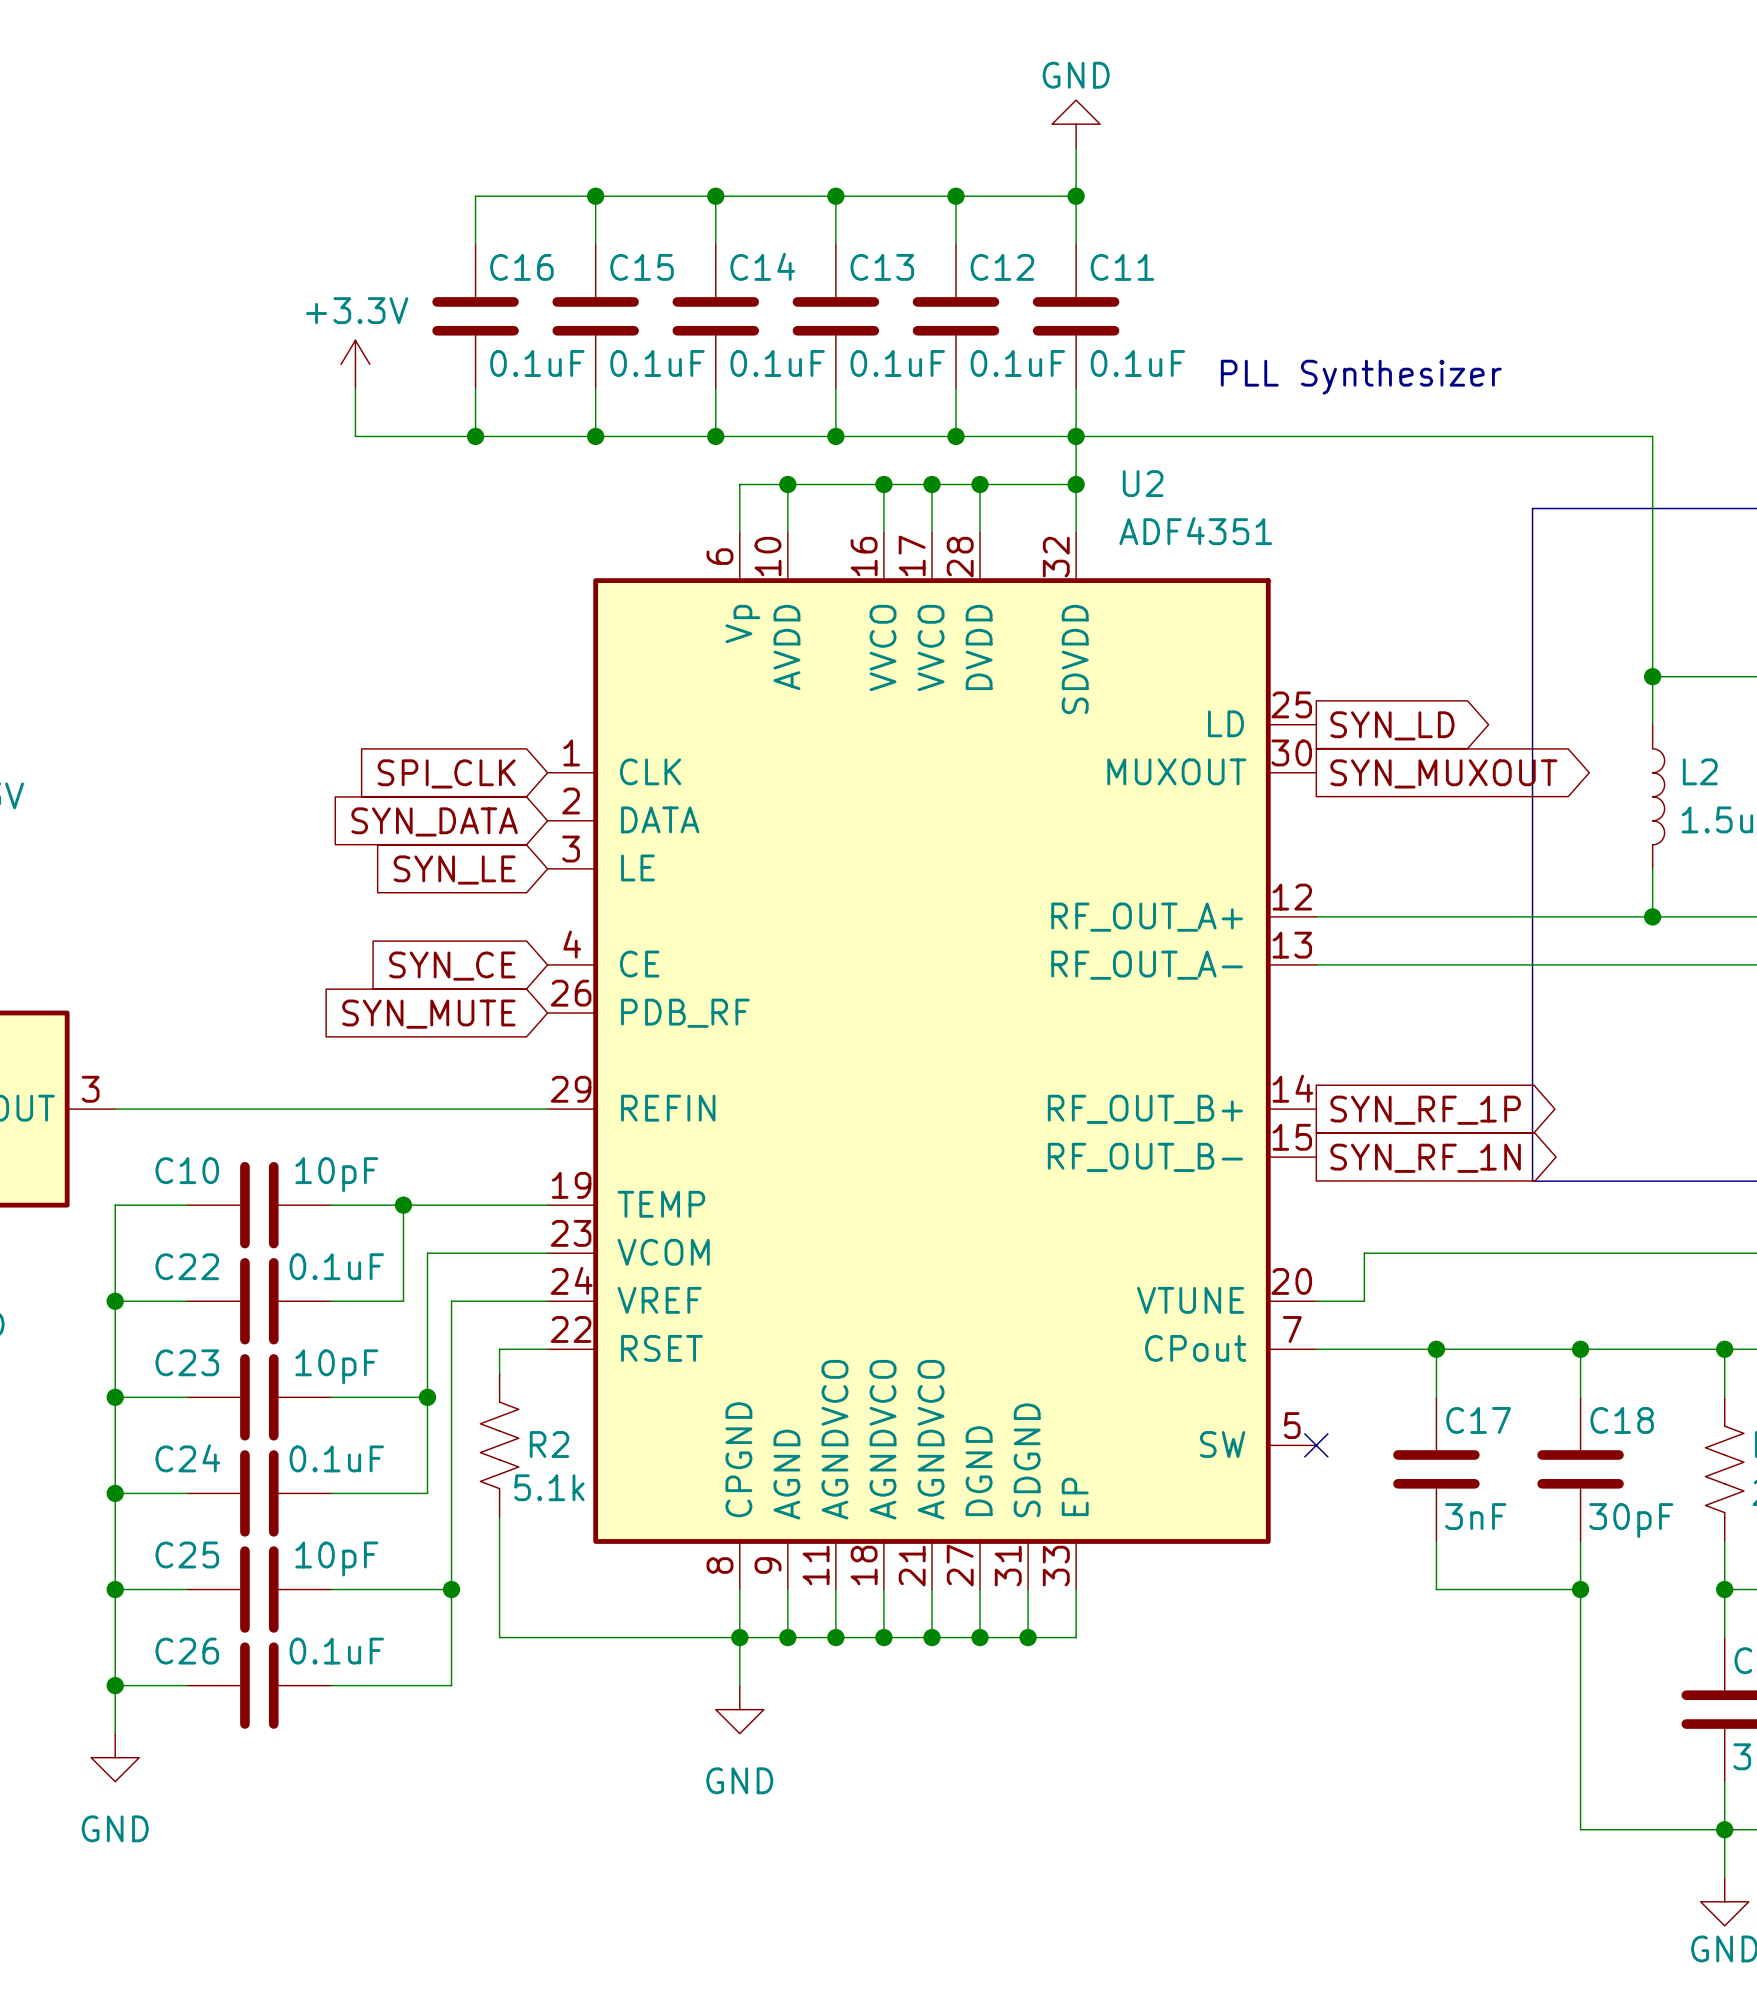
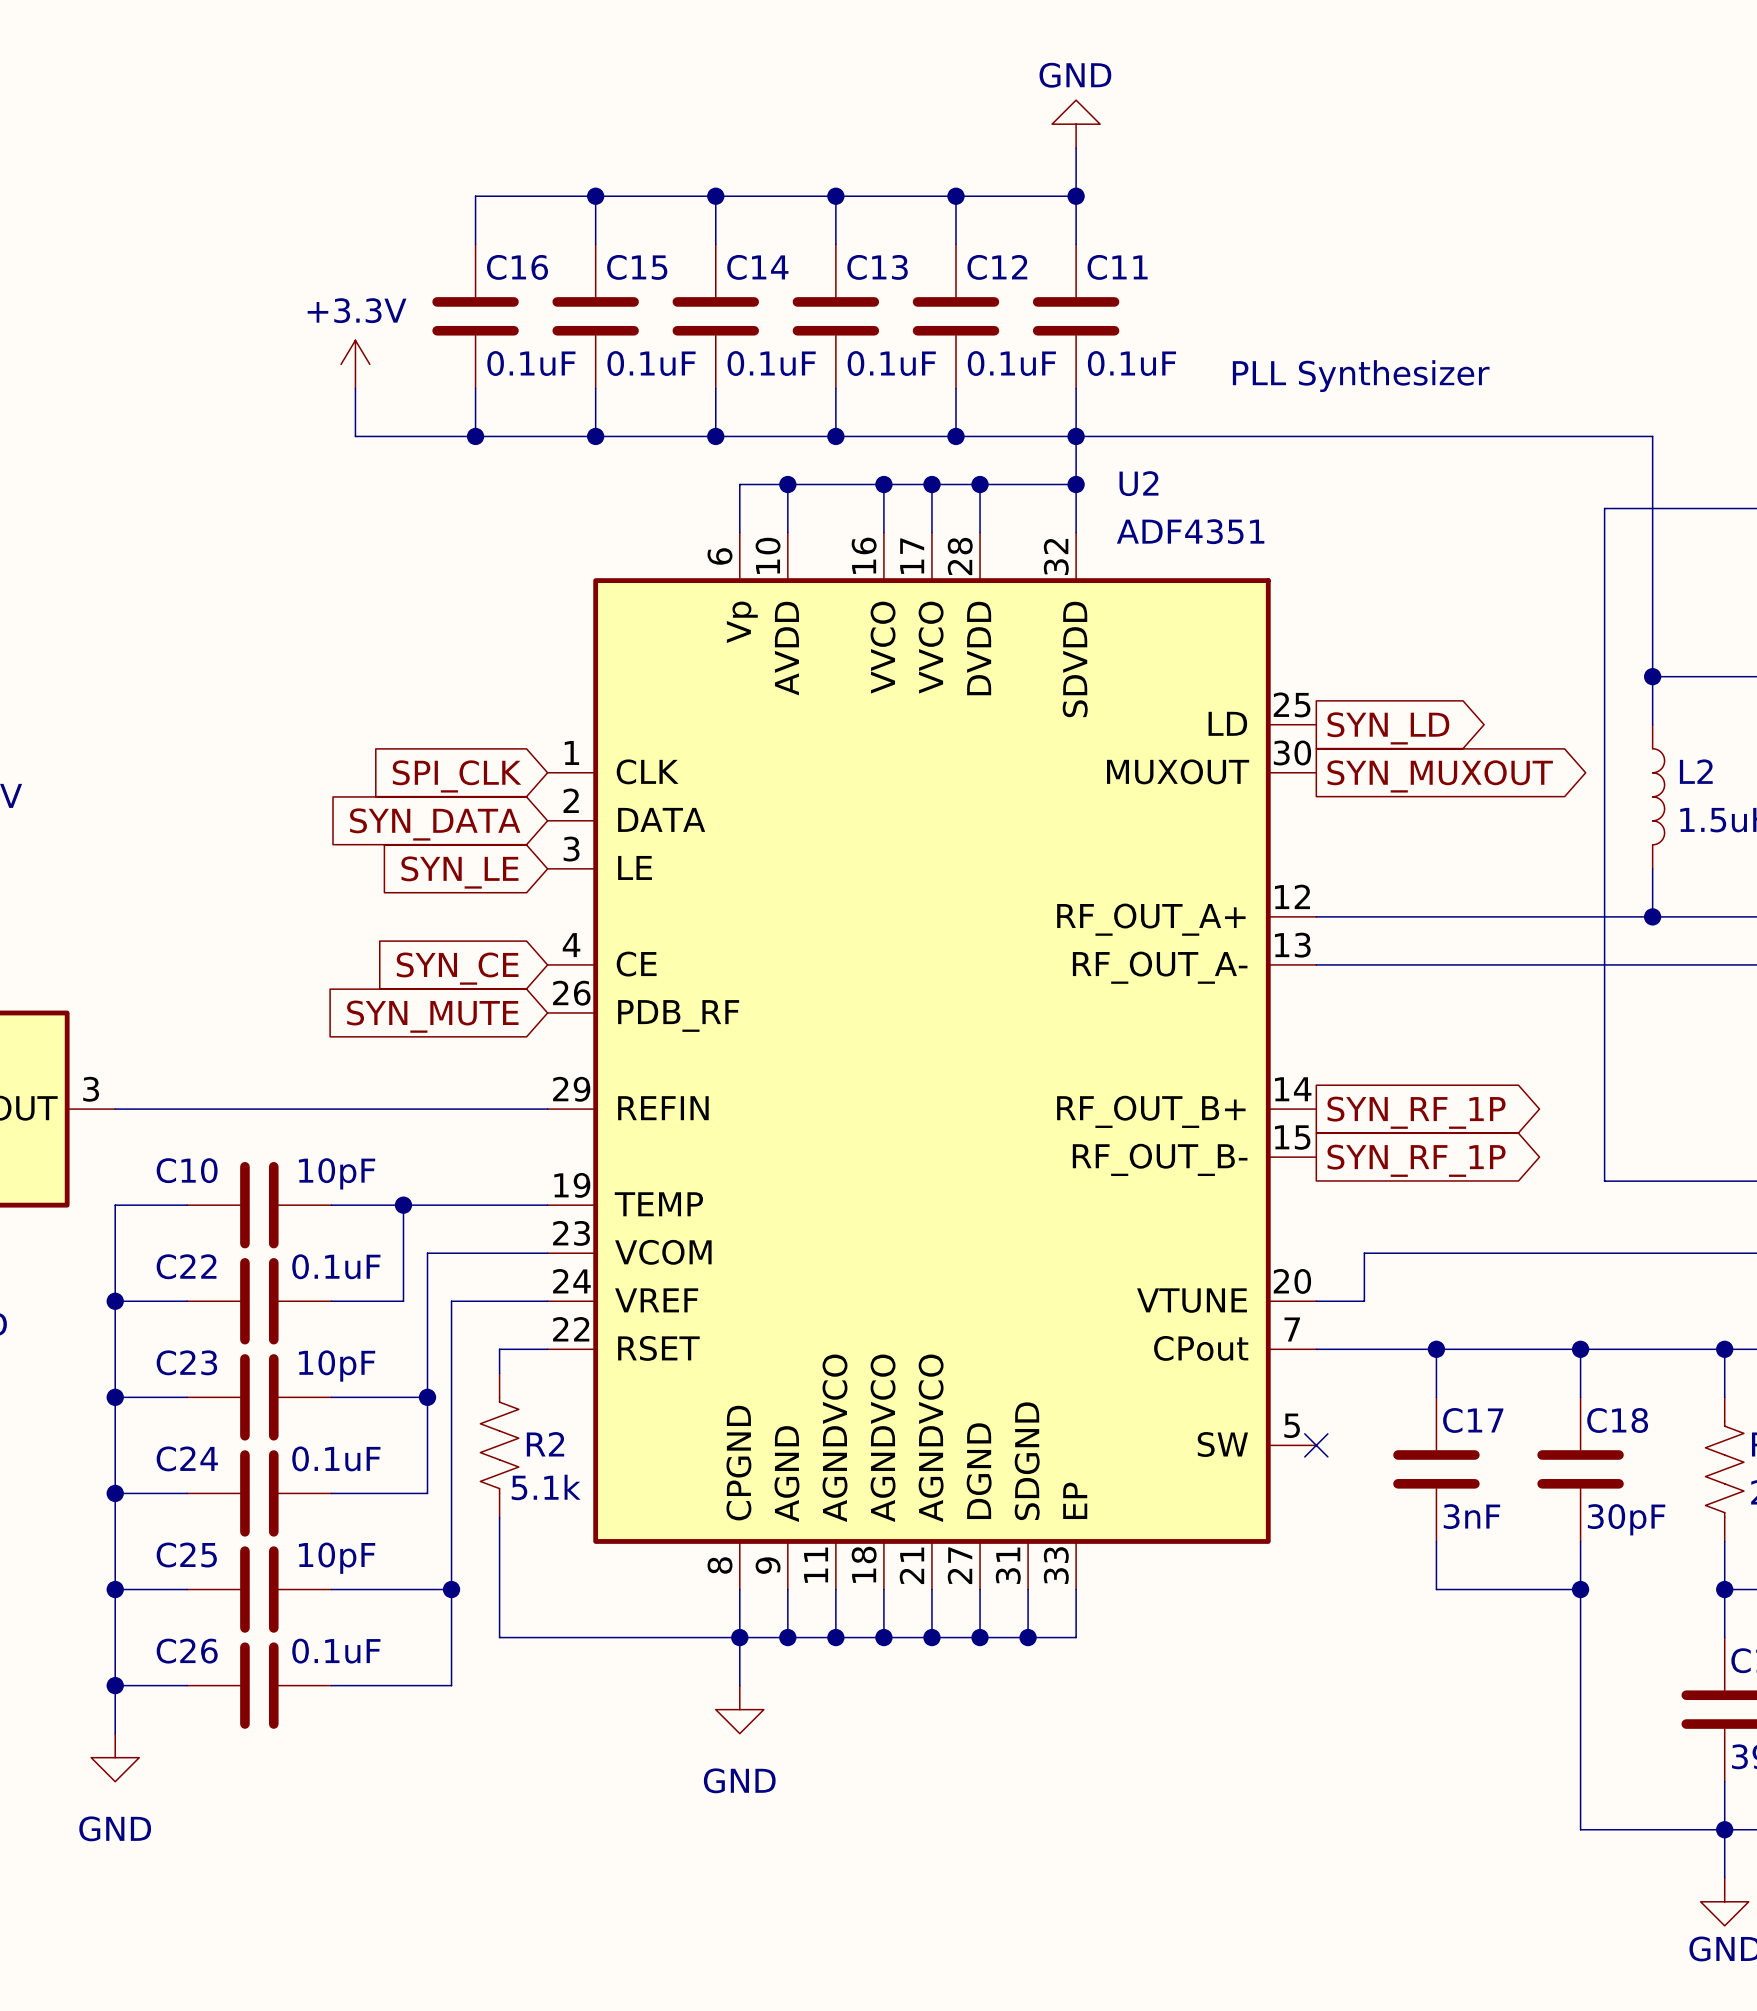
line: (1604, 508) (1532, 508) (1532, 1181) (1604, 1181) -> (1604, 508) (1604, 1181)
global label: SYN_RF_1N (1425, 1158) -> SYN_RF_1P (1416, 1160)

